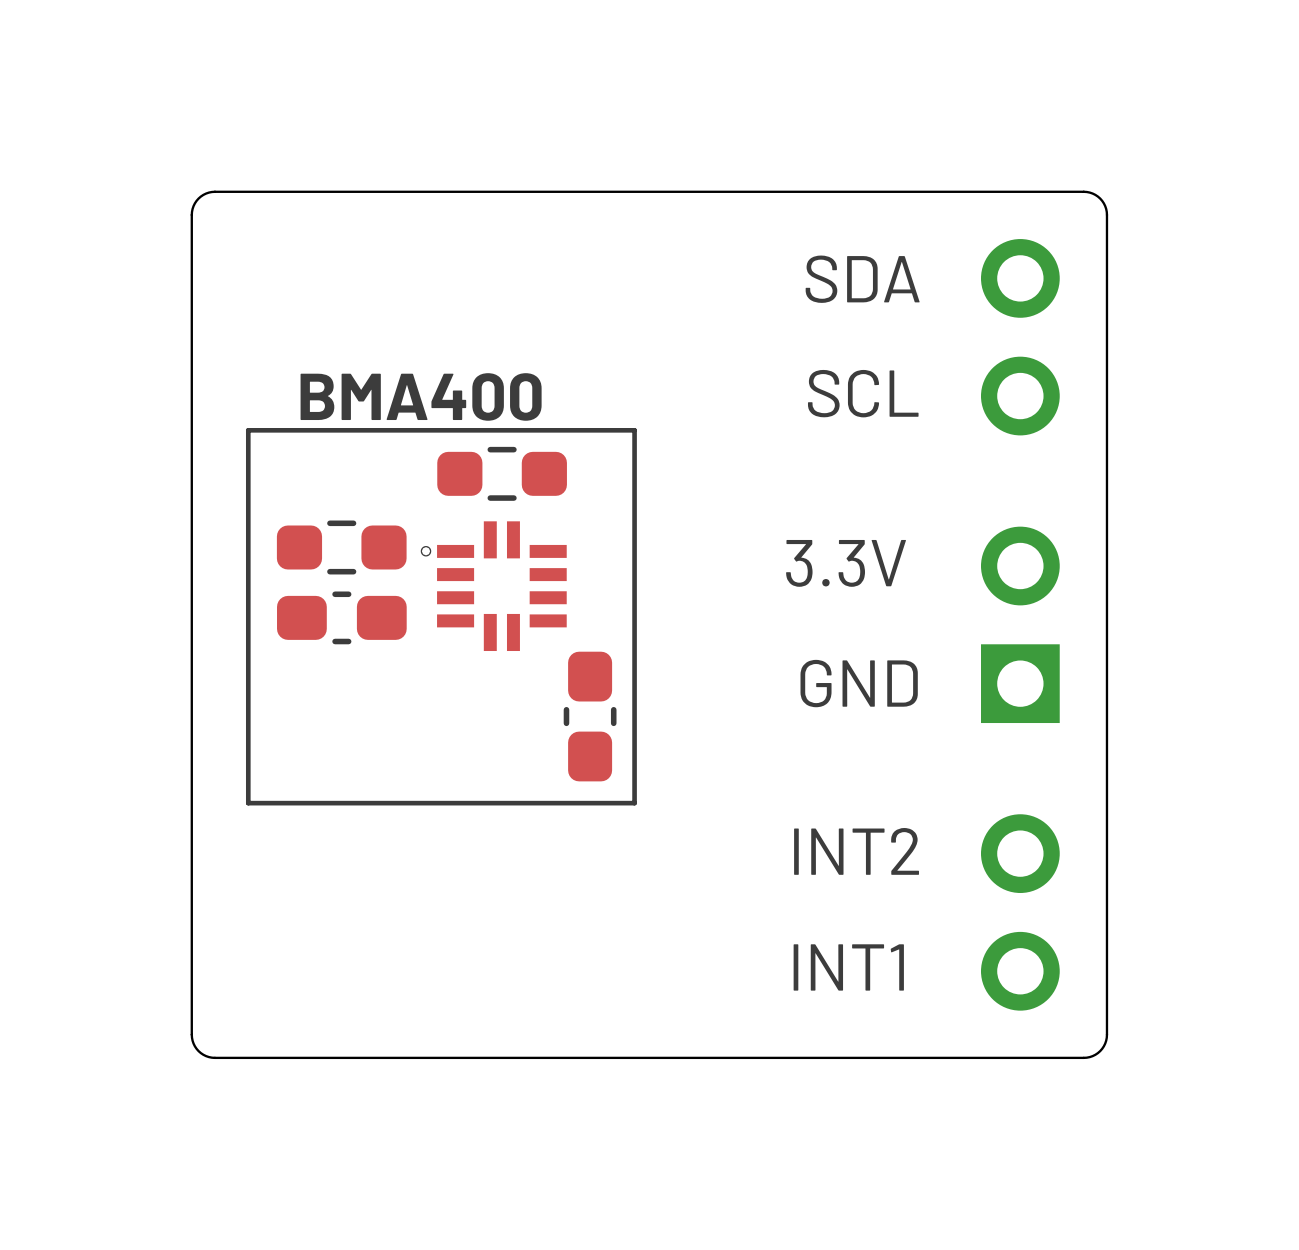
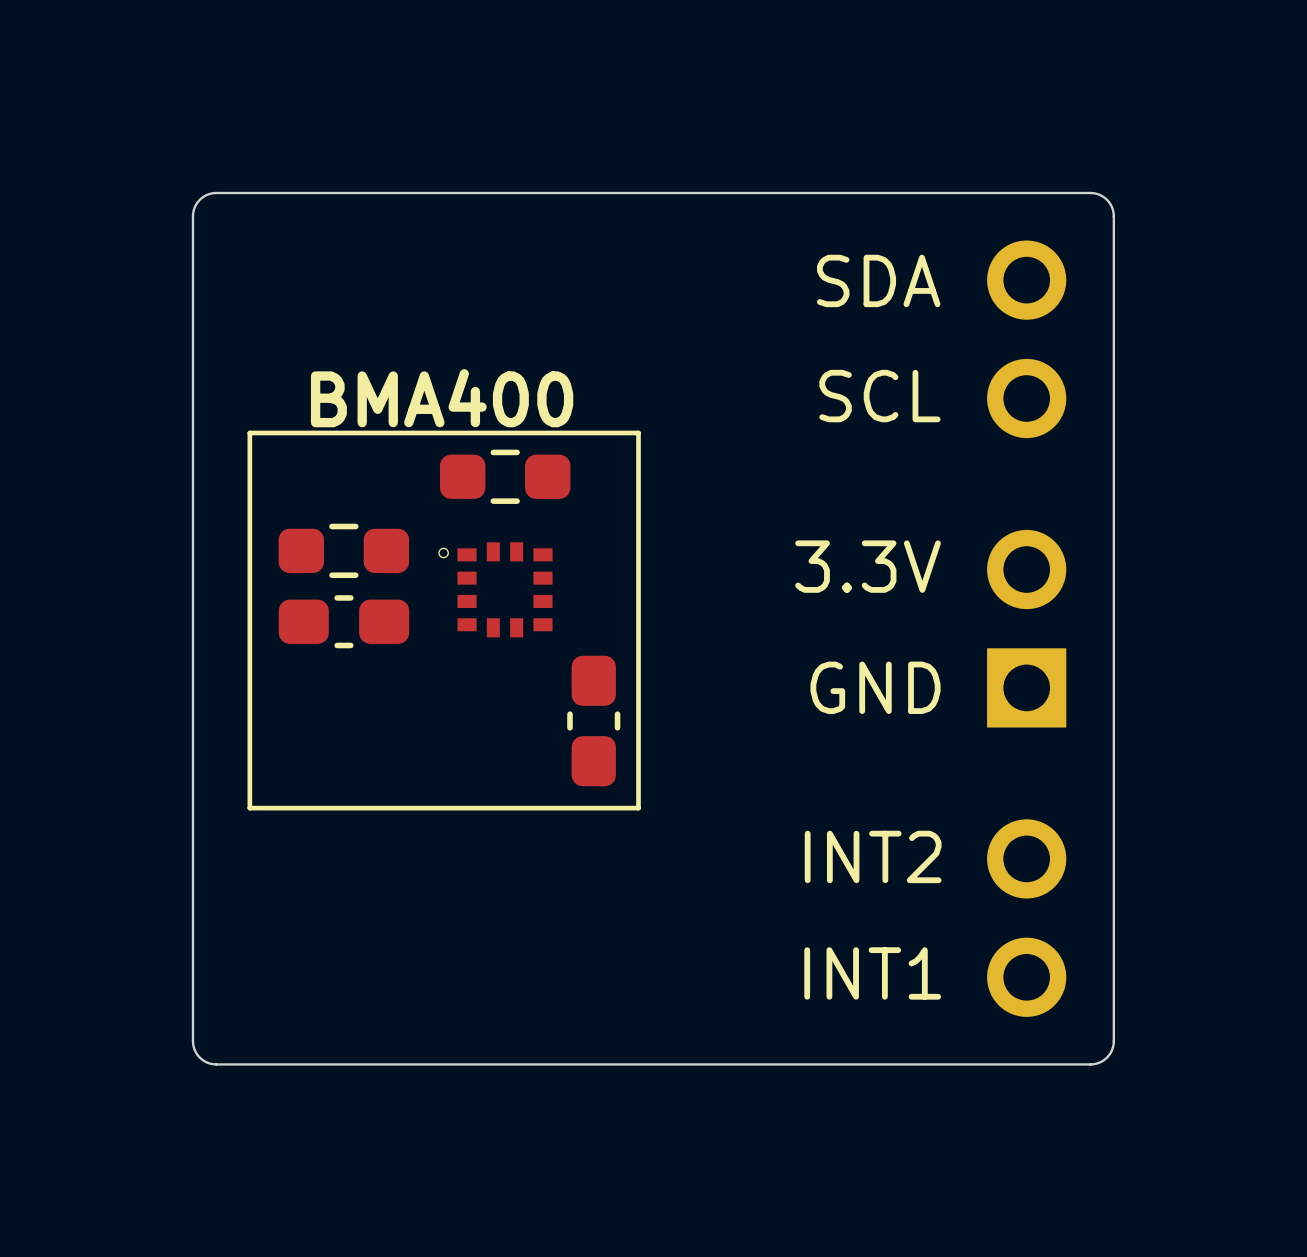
part footprint: [420, 521, 567, 652] -> [438, 542, 553, 638]

